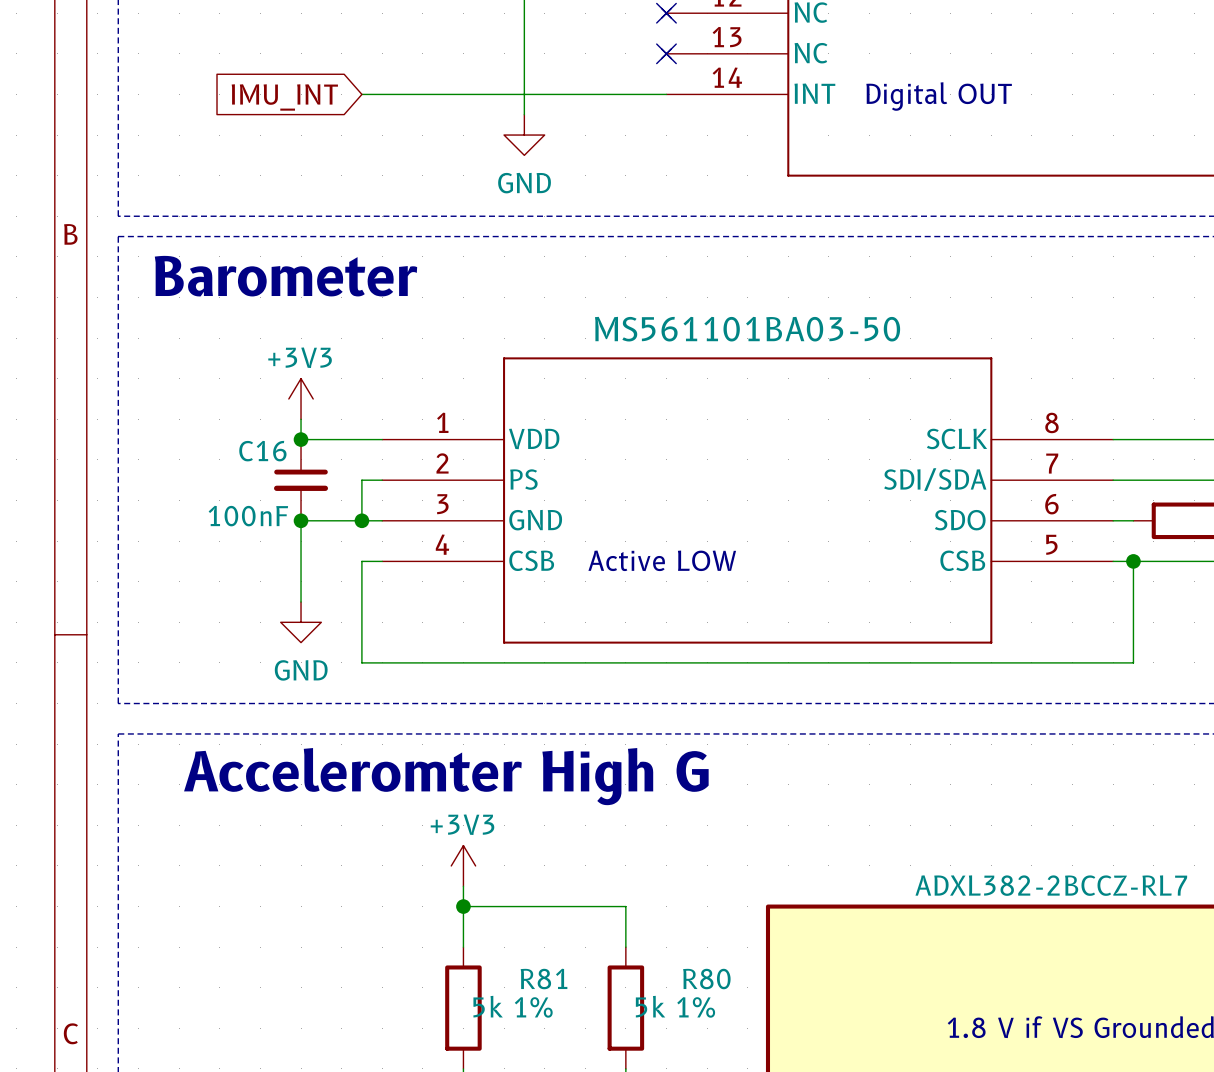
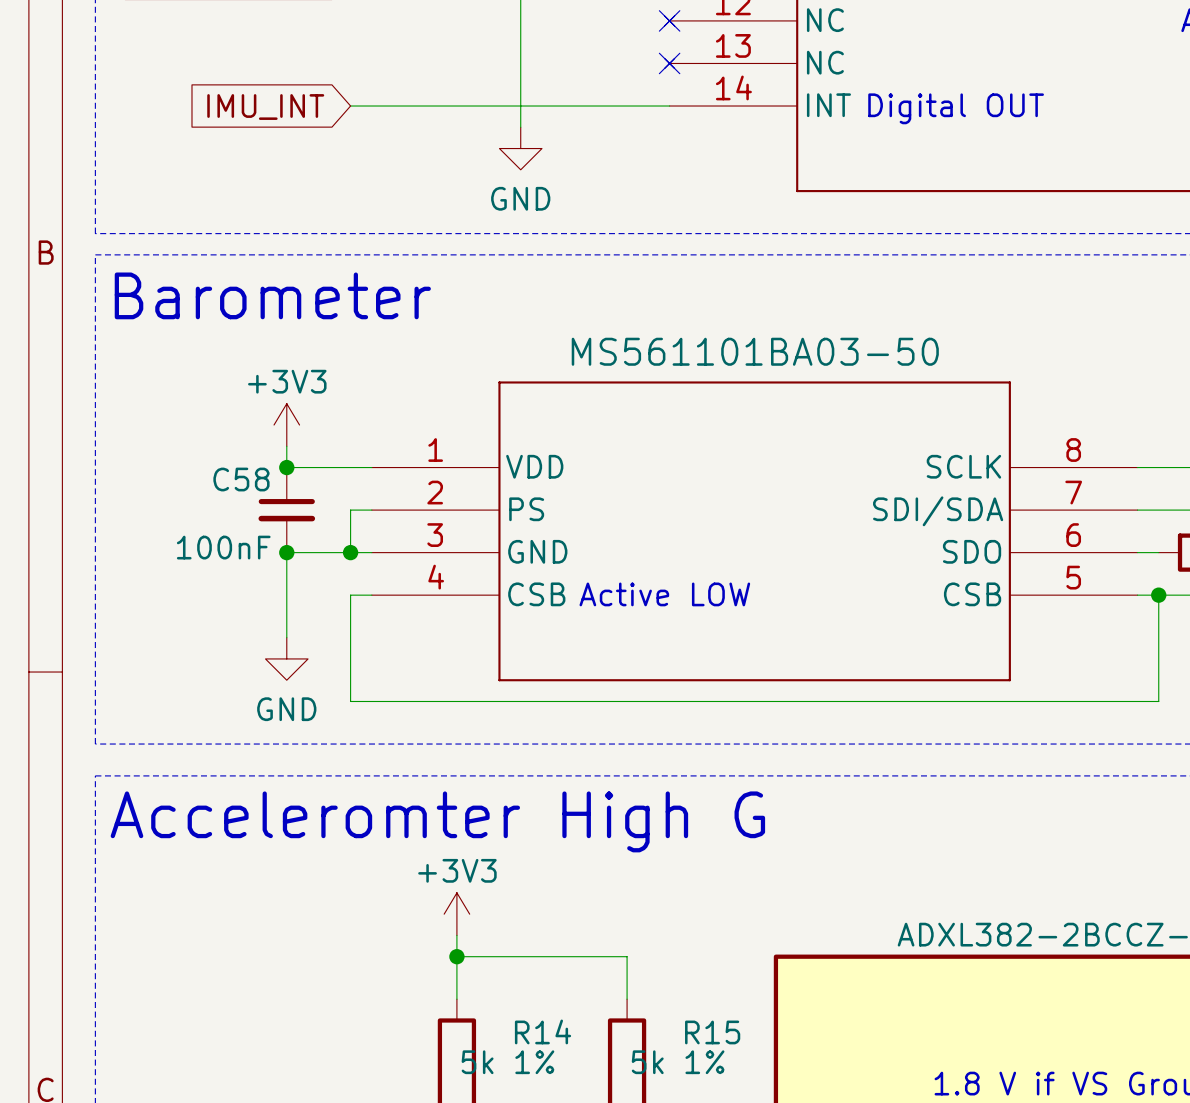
C16 name: C16 (262, 451) -> C58 (241, 479)
R81 name: R81 (544, 979) -> R14 (543, 1031)
R80 name: R80 (706, 979) -> R15 (712, 1032)

